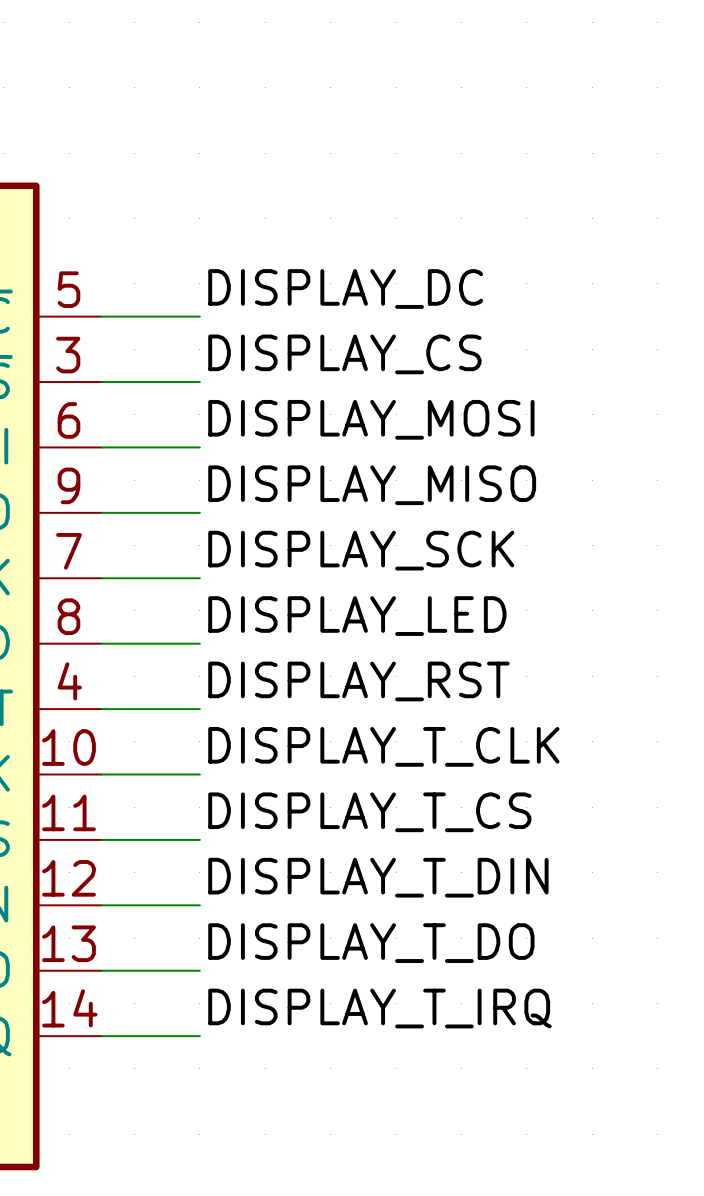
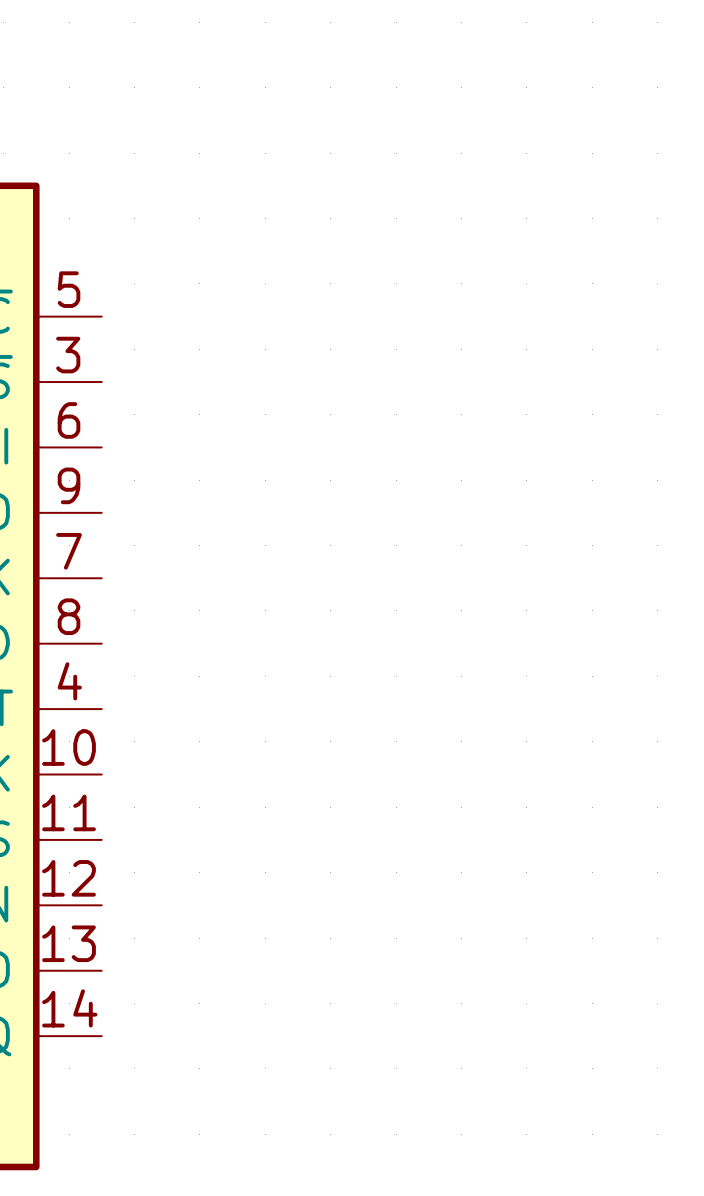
label: DISPLAY_DC (345, 288) -> none
wire: (101, 316) (199, 316) -> none
label: DISPLAY_CS (344, 354) -> none
wire: (101, 382) (199, 382) -> none
label: DISPLAY_MOSI (371, 419) -> none
wire: (101, 447) (199, 447) -> none
label: DISPLAY_MISO (372, 485) -> none
wire: (101, 512) (199, 512) -> none
label: DISPLAY_SCK (361, 550) -> none
wire: (101, 578) (199, 578) -> none
label: DISPLAY_LED (357, 616) -> none
wire: (101, 643) (199, 643) -> none
label: DISPLAY_RST (358, 681) -> none
wire: (101, 709) (199, 709) -> none
label: DISPLAY_T_CLK (383, 746) -> none
wire: (101, 774) (199, 774) -> none
label: DISPLAY_T_CS (369, 812) -> none
wire: (101, 839) (199, 839) -> none
label: DISPLAY_T_DIN (378, 877) -> none
wire: (101, 905) (199, 905) -> none
label: DISPLAY_T_DO (371, 943) -> none
wire: (101, 970) (199, 970) -> none
label: DISPLAY_T_IRQ (379, 1008) -> none
wire: (101, 1036) (199, 1036) -> none

